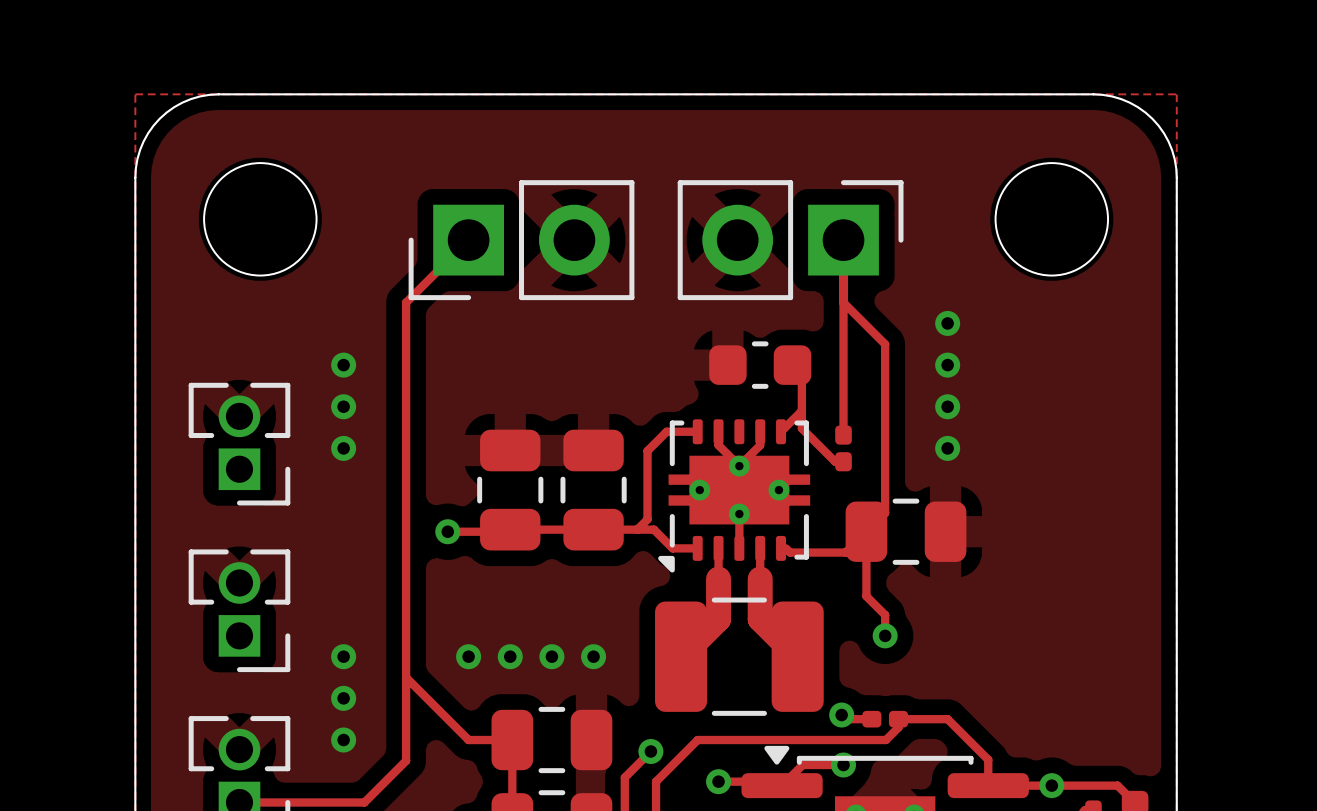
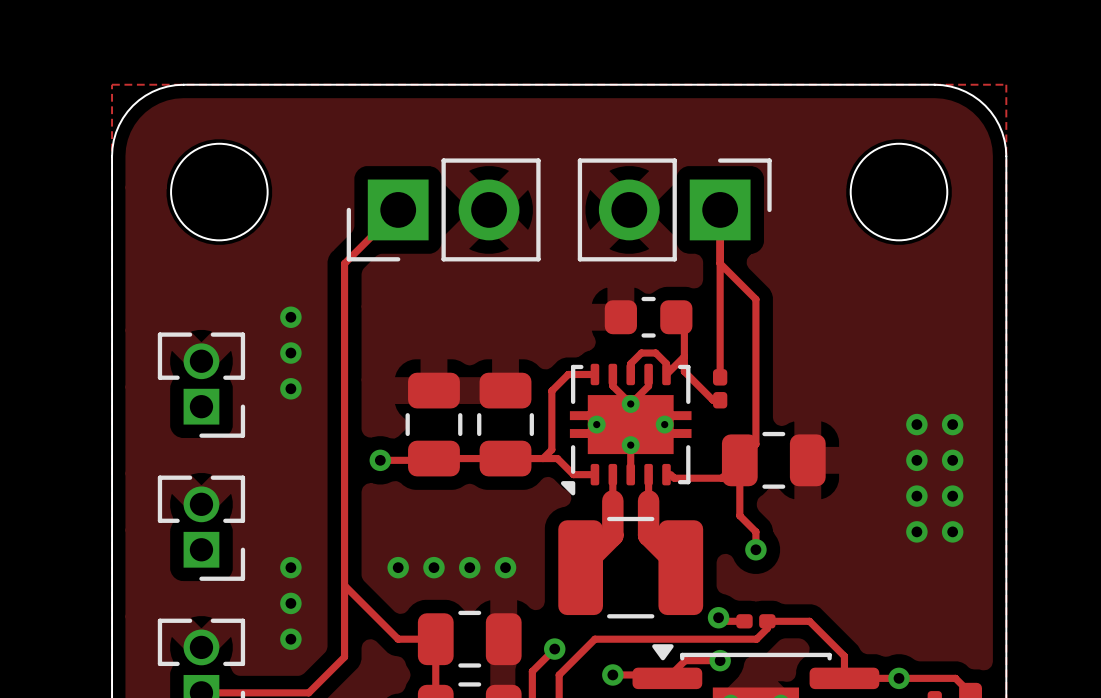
via: (947, 323) -> none
via: (947, 365) -> none
via: (947, 406) -> none
track: none -> (630, 374) (630, 363) (641, 353) (655, 353) (666, 363) (666, 374)
via: (947, 448) -> none
via: none -> (916, 424)
via: none -> (952, 424)
via: none -> (916, 460)
via: none -> (952, 460)
via: none -> (916, 496)
via: none -> (952, 496)
via: none -> (916, 531)
via: none -> (952, 531)

